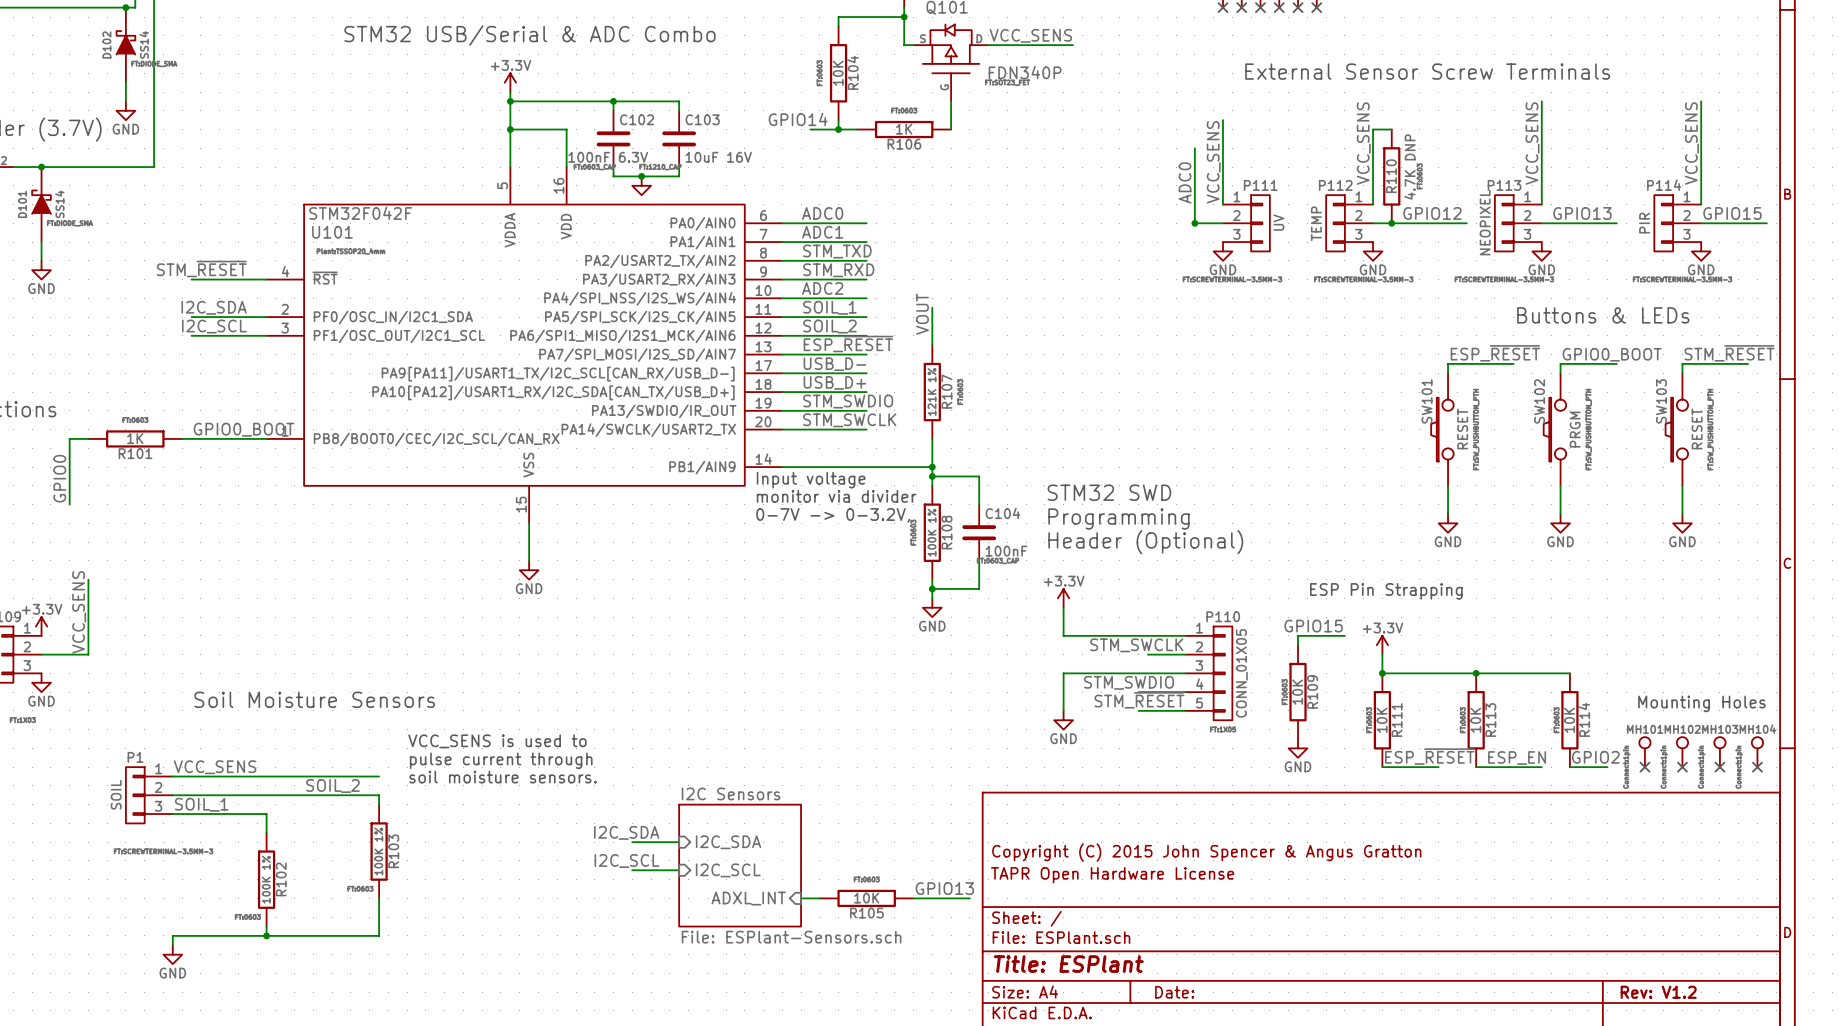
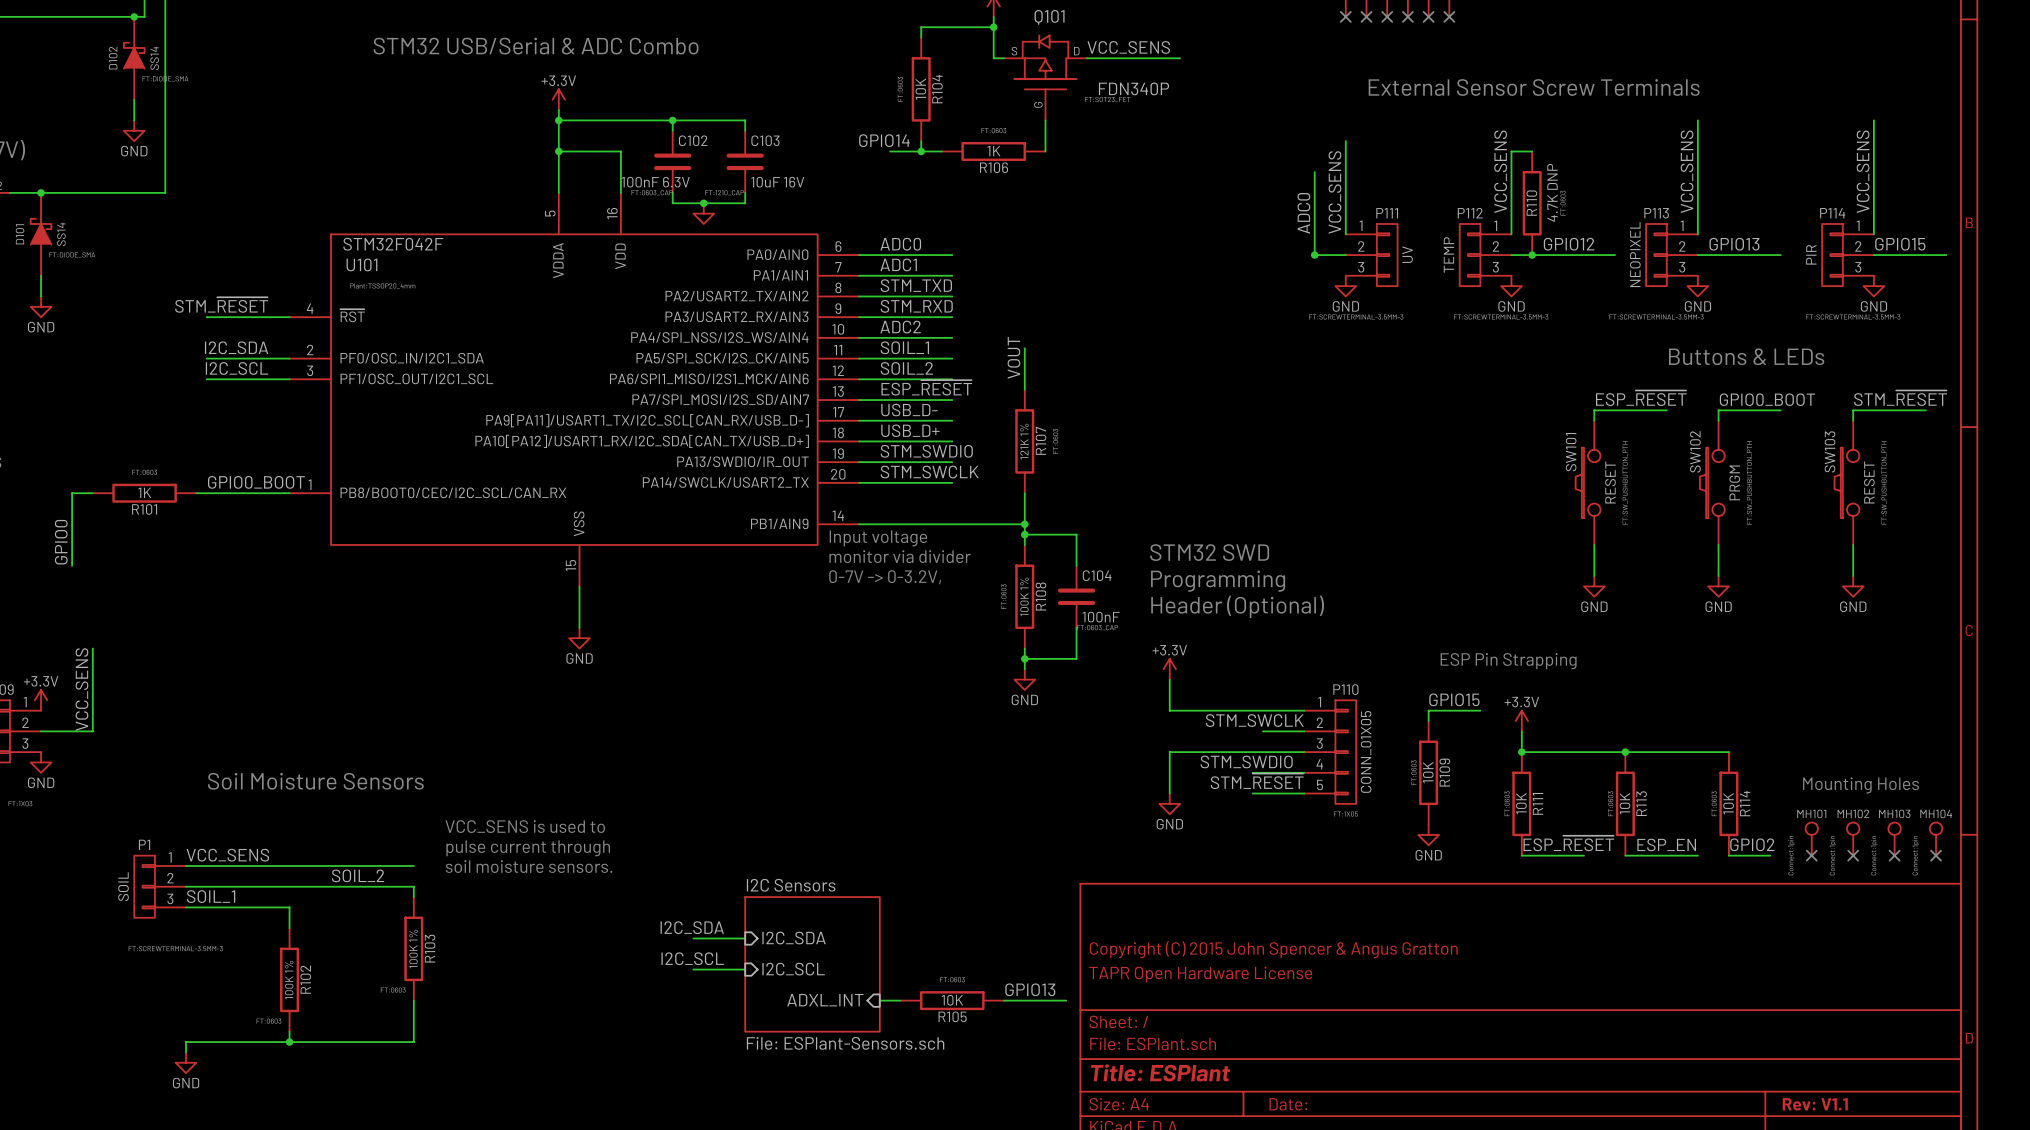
title block: Rev: V1.2 (1658, 992) -> Rev: V1.1 (1815, 1104)

